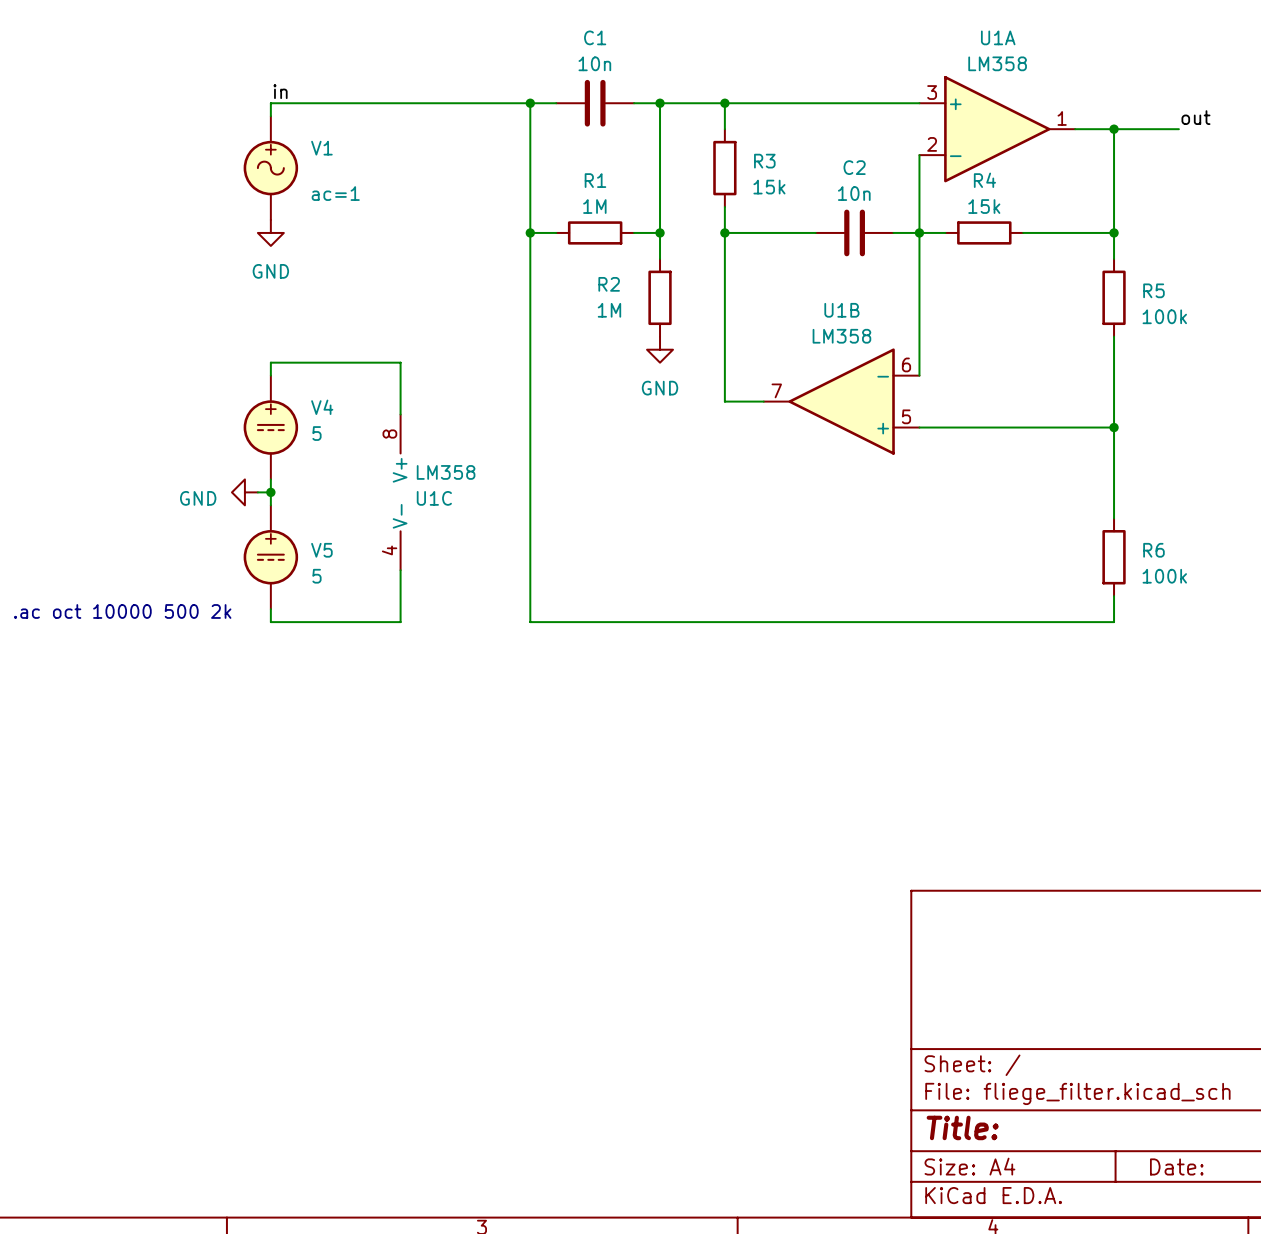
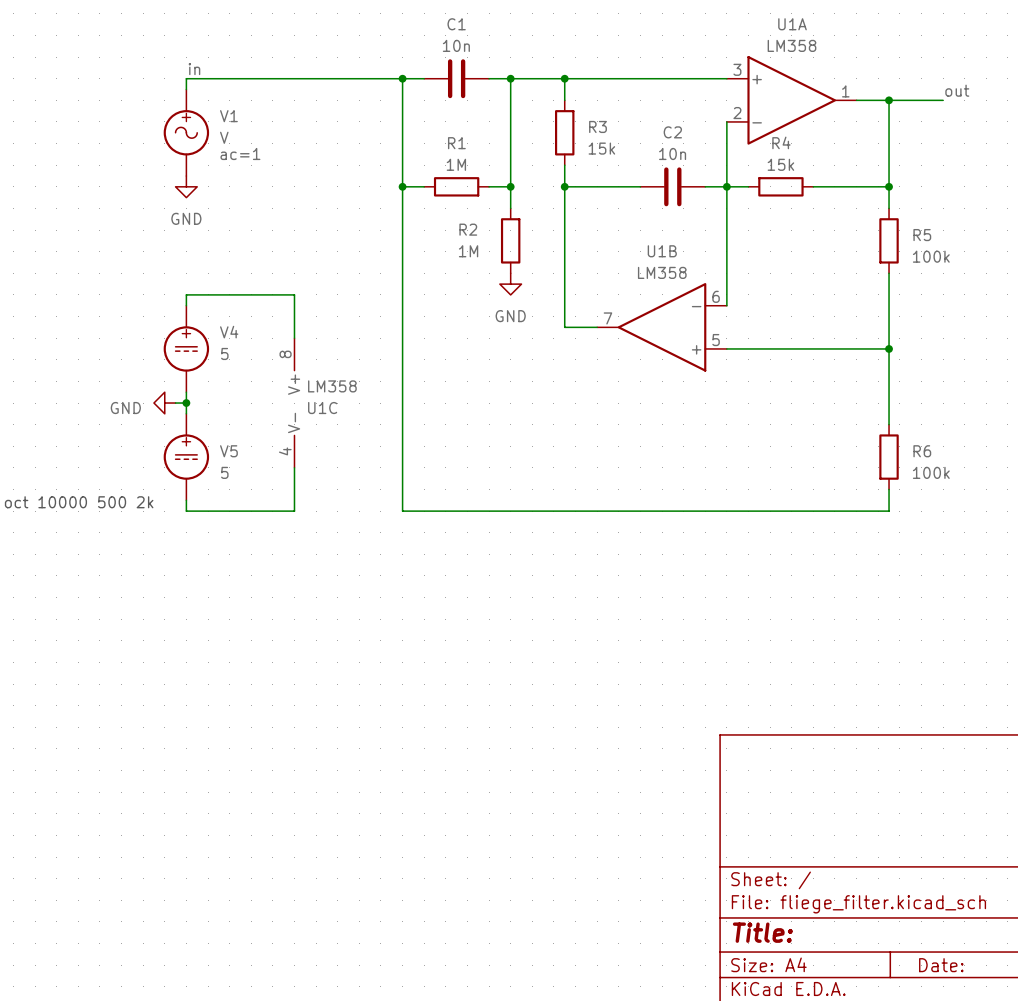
V1 value: none -> V (224, 137)

